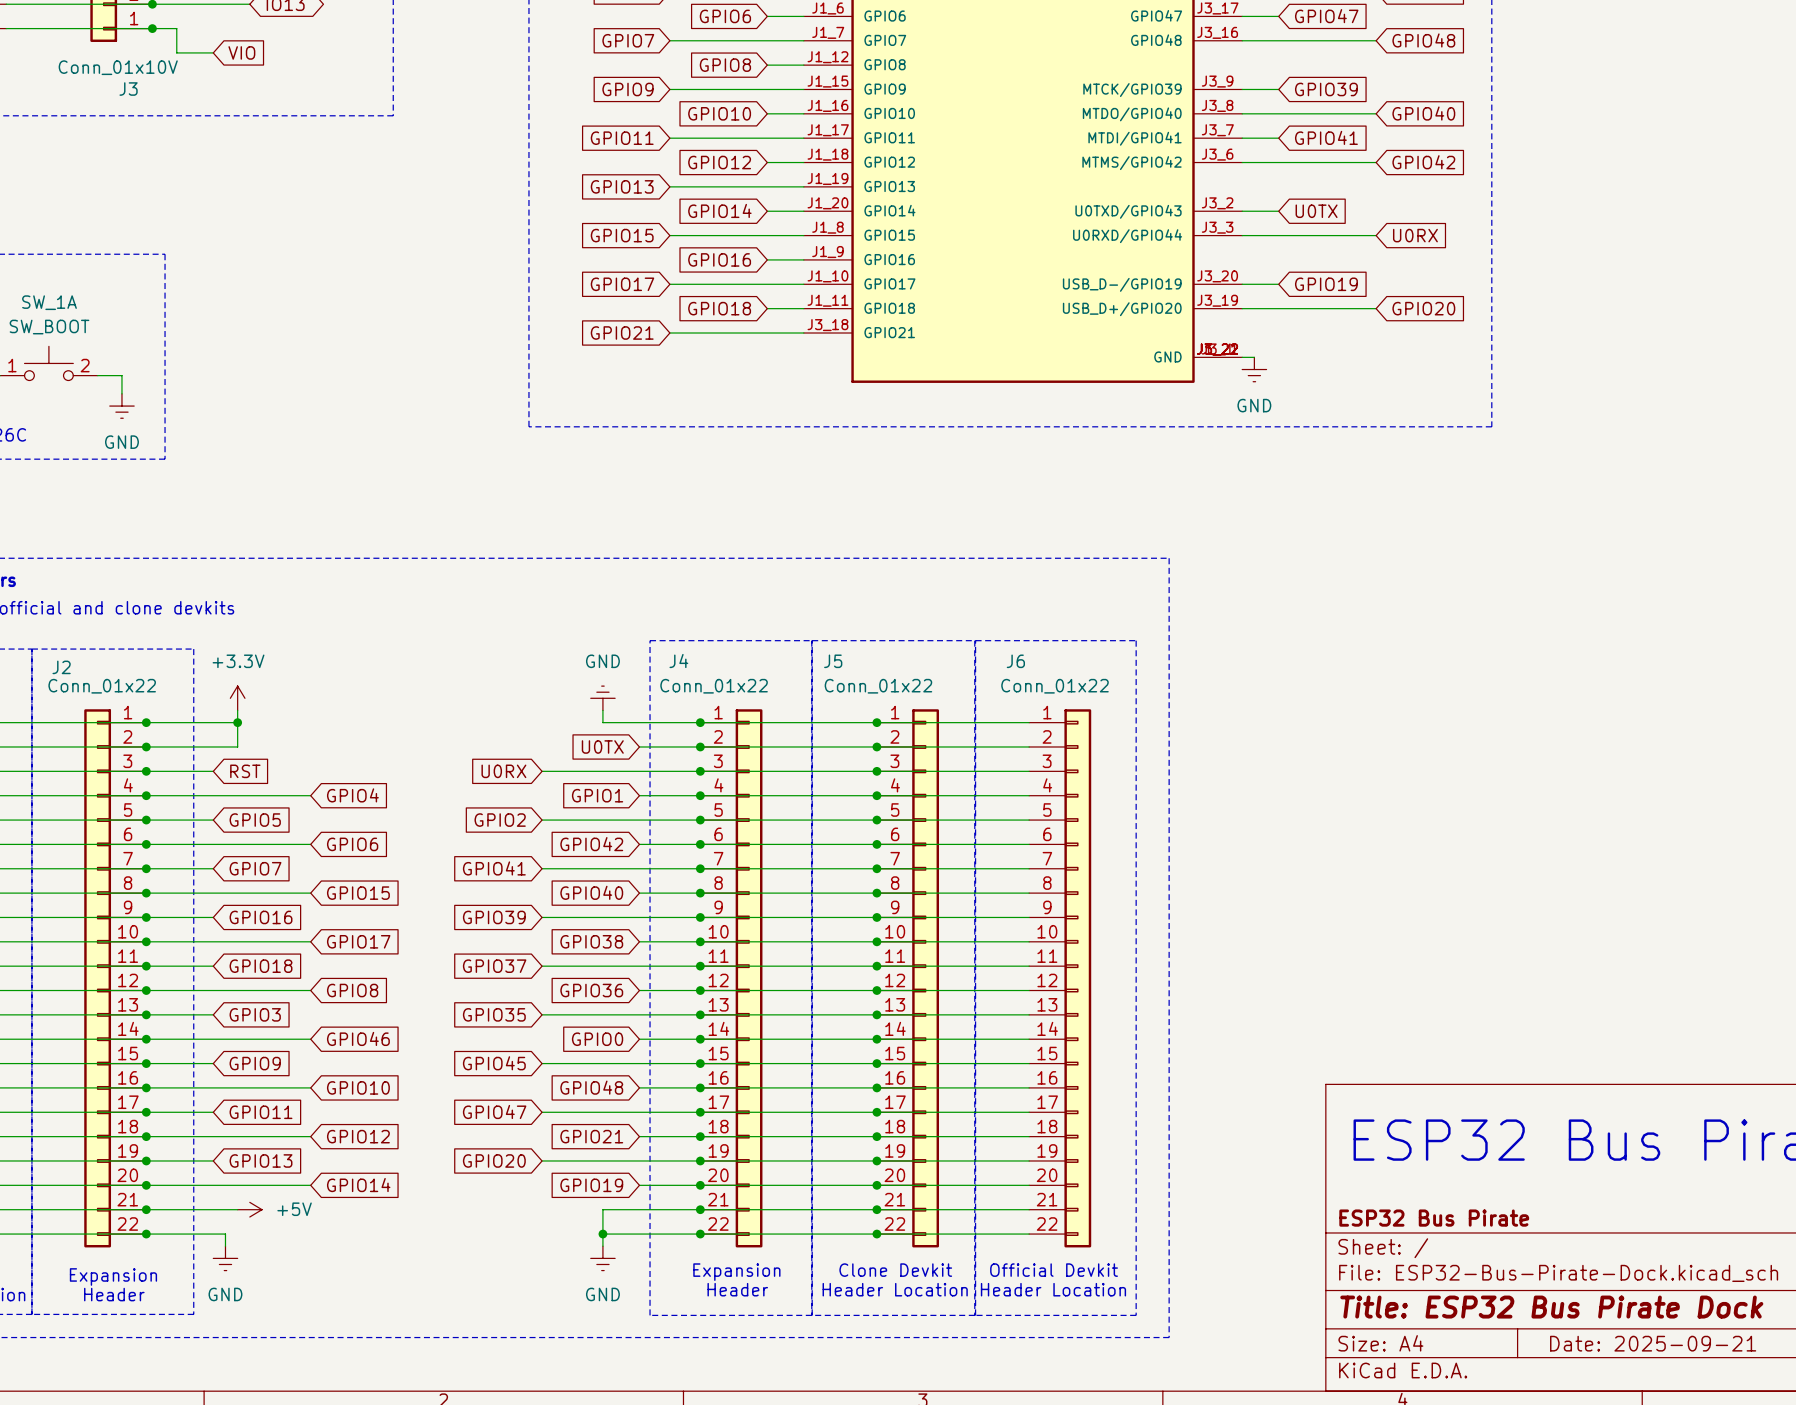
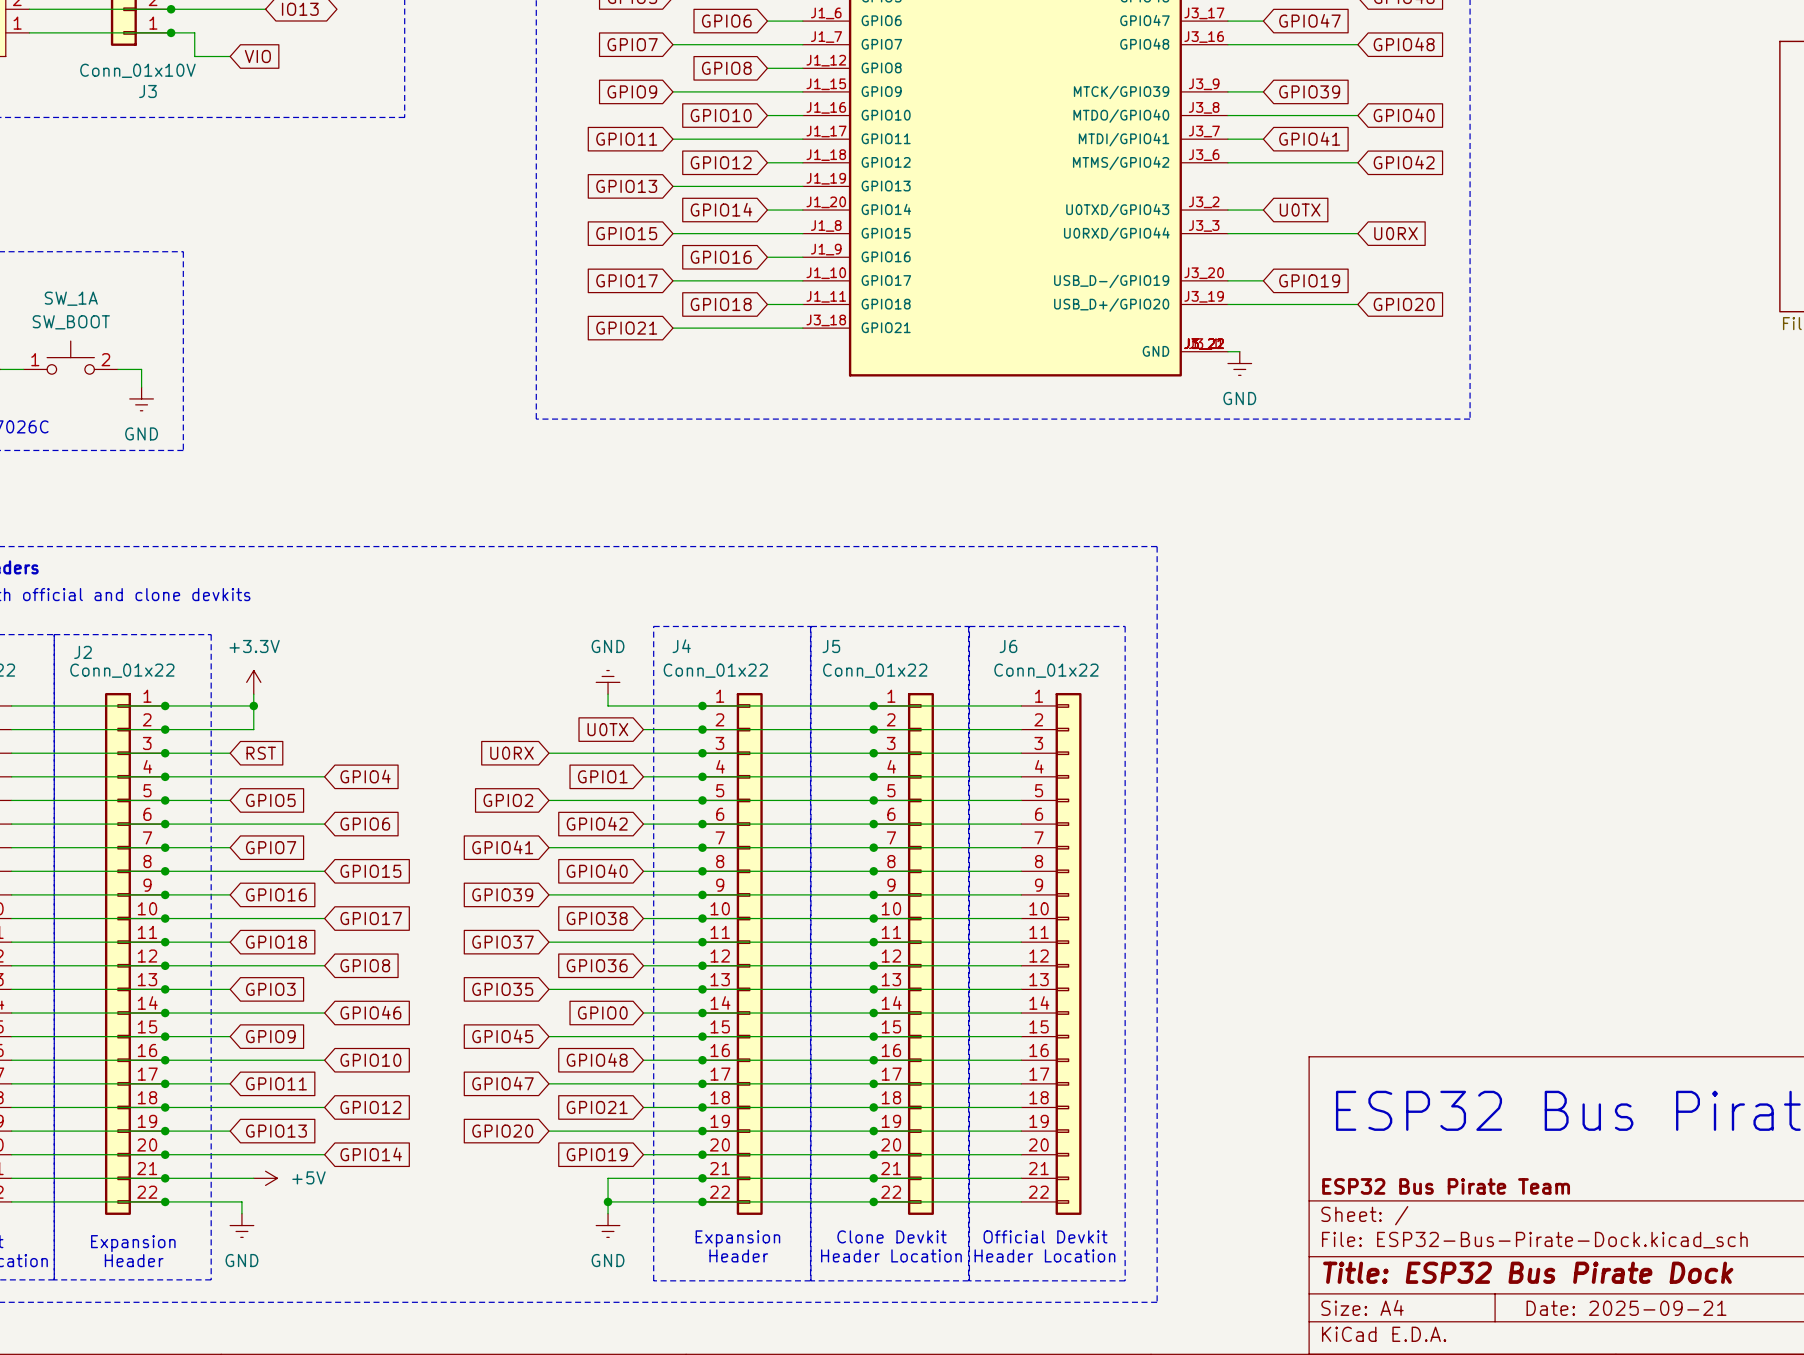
title block: ESP32 Bus Pirate (1434, 1218) -> ESP32 Bus Pirate Team (1446, 1186)

